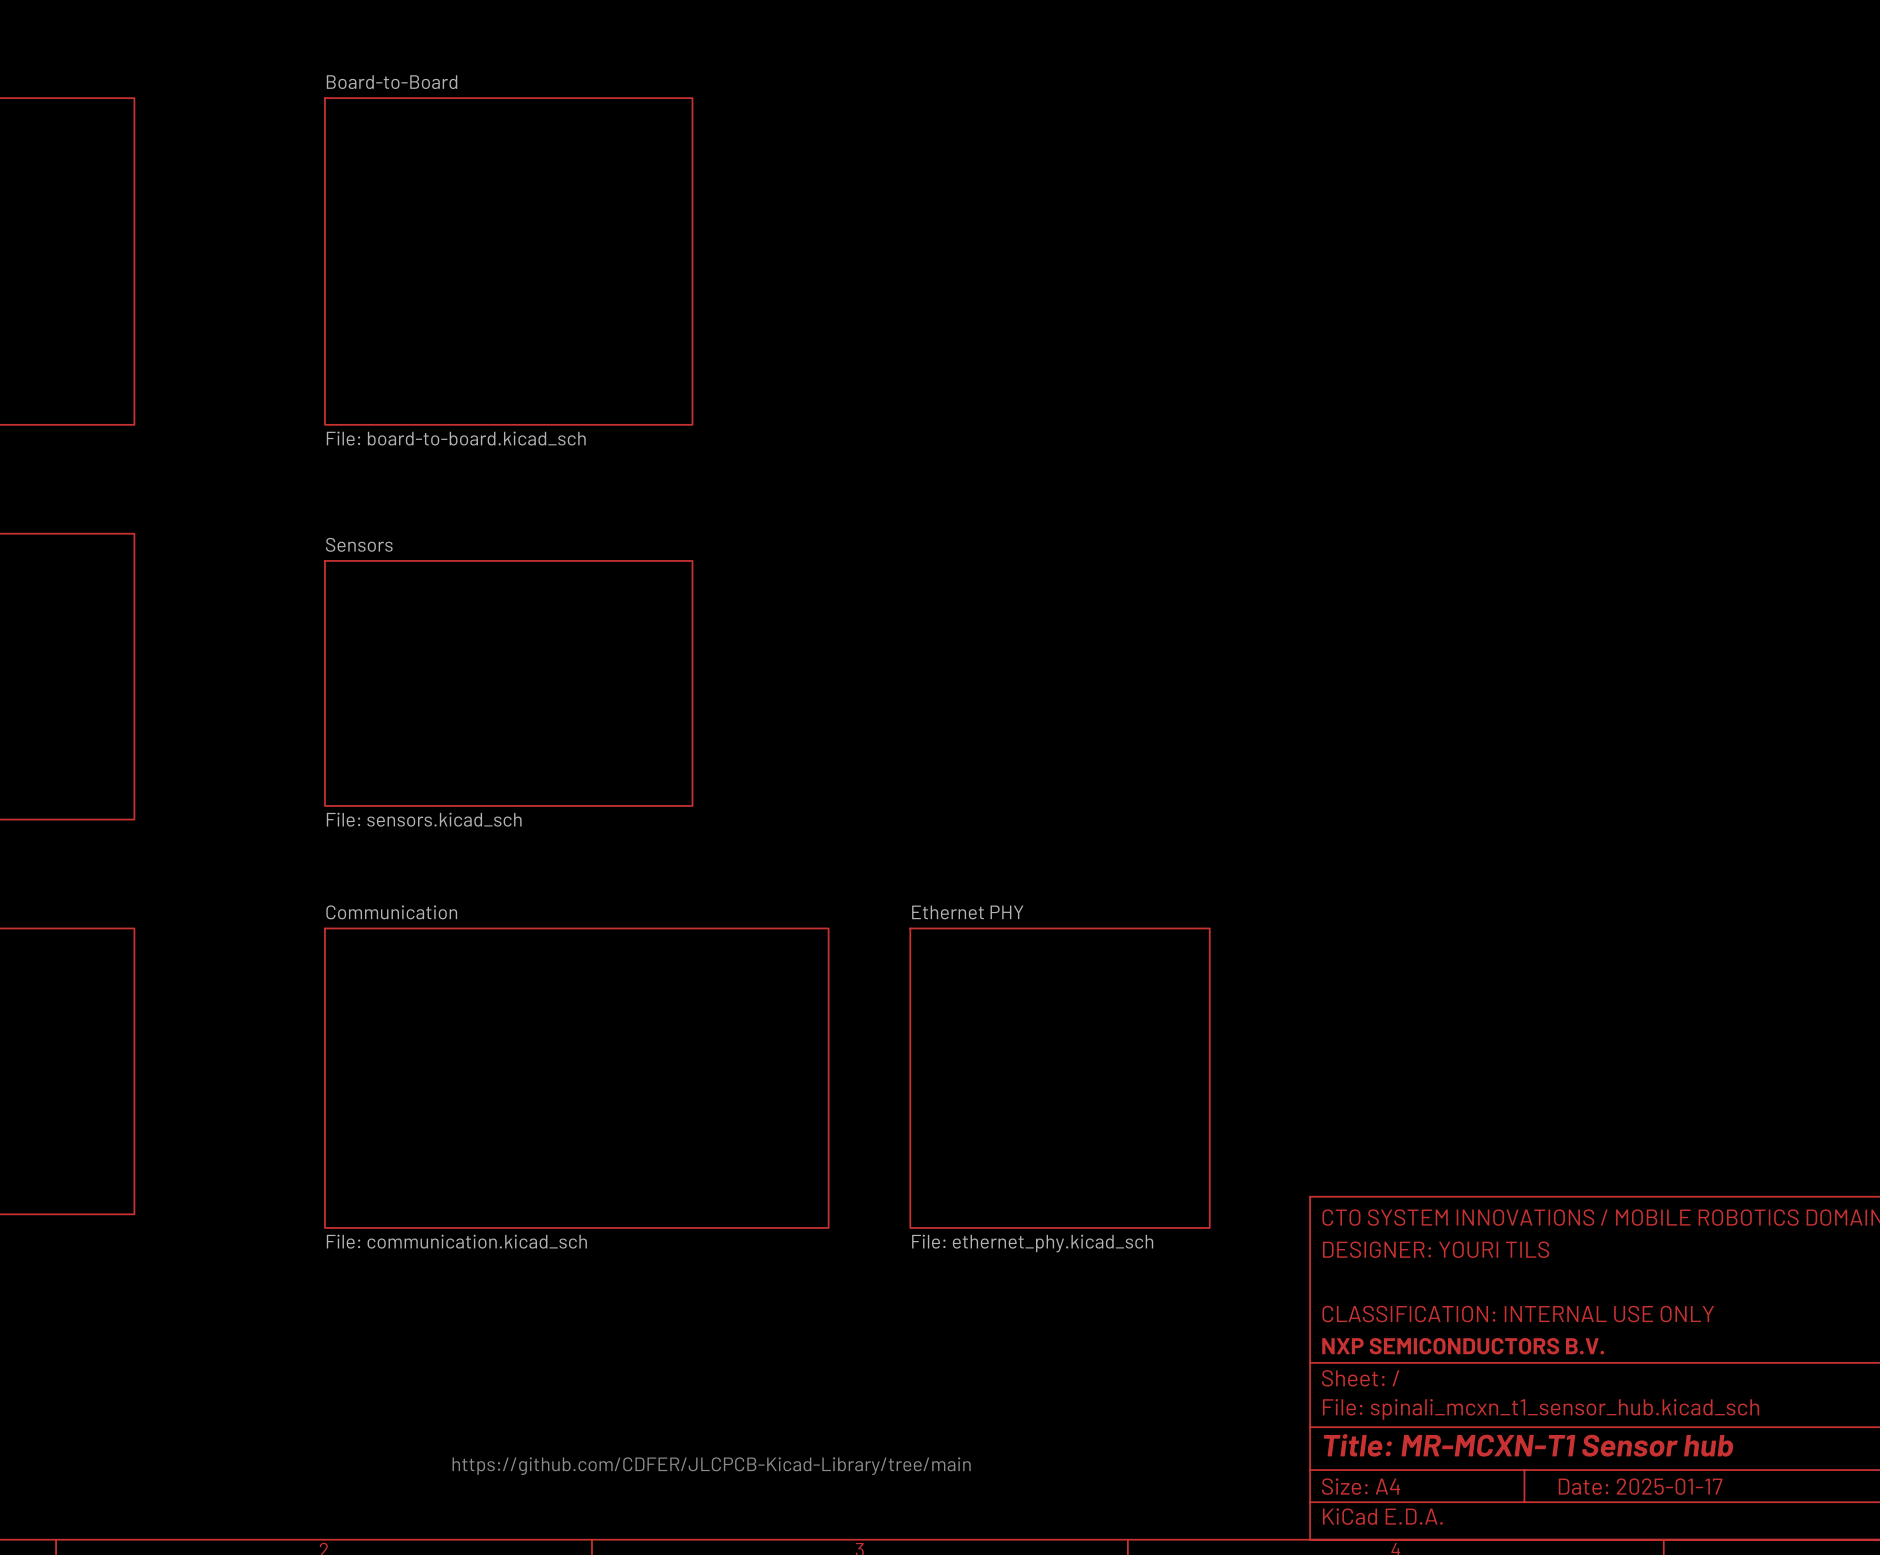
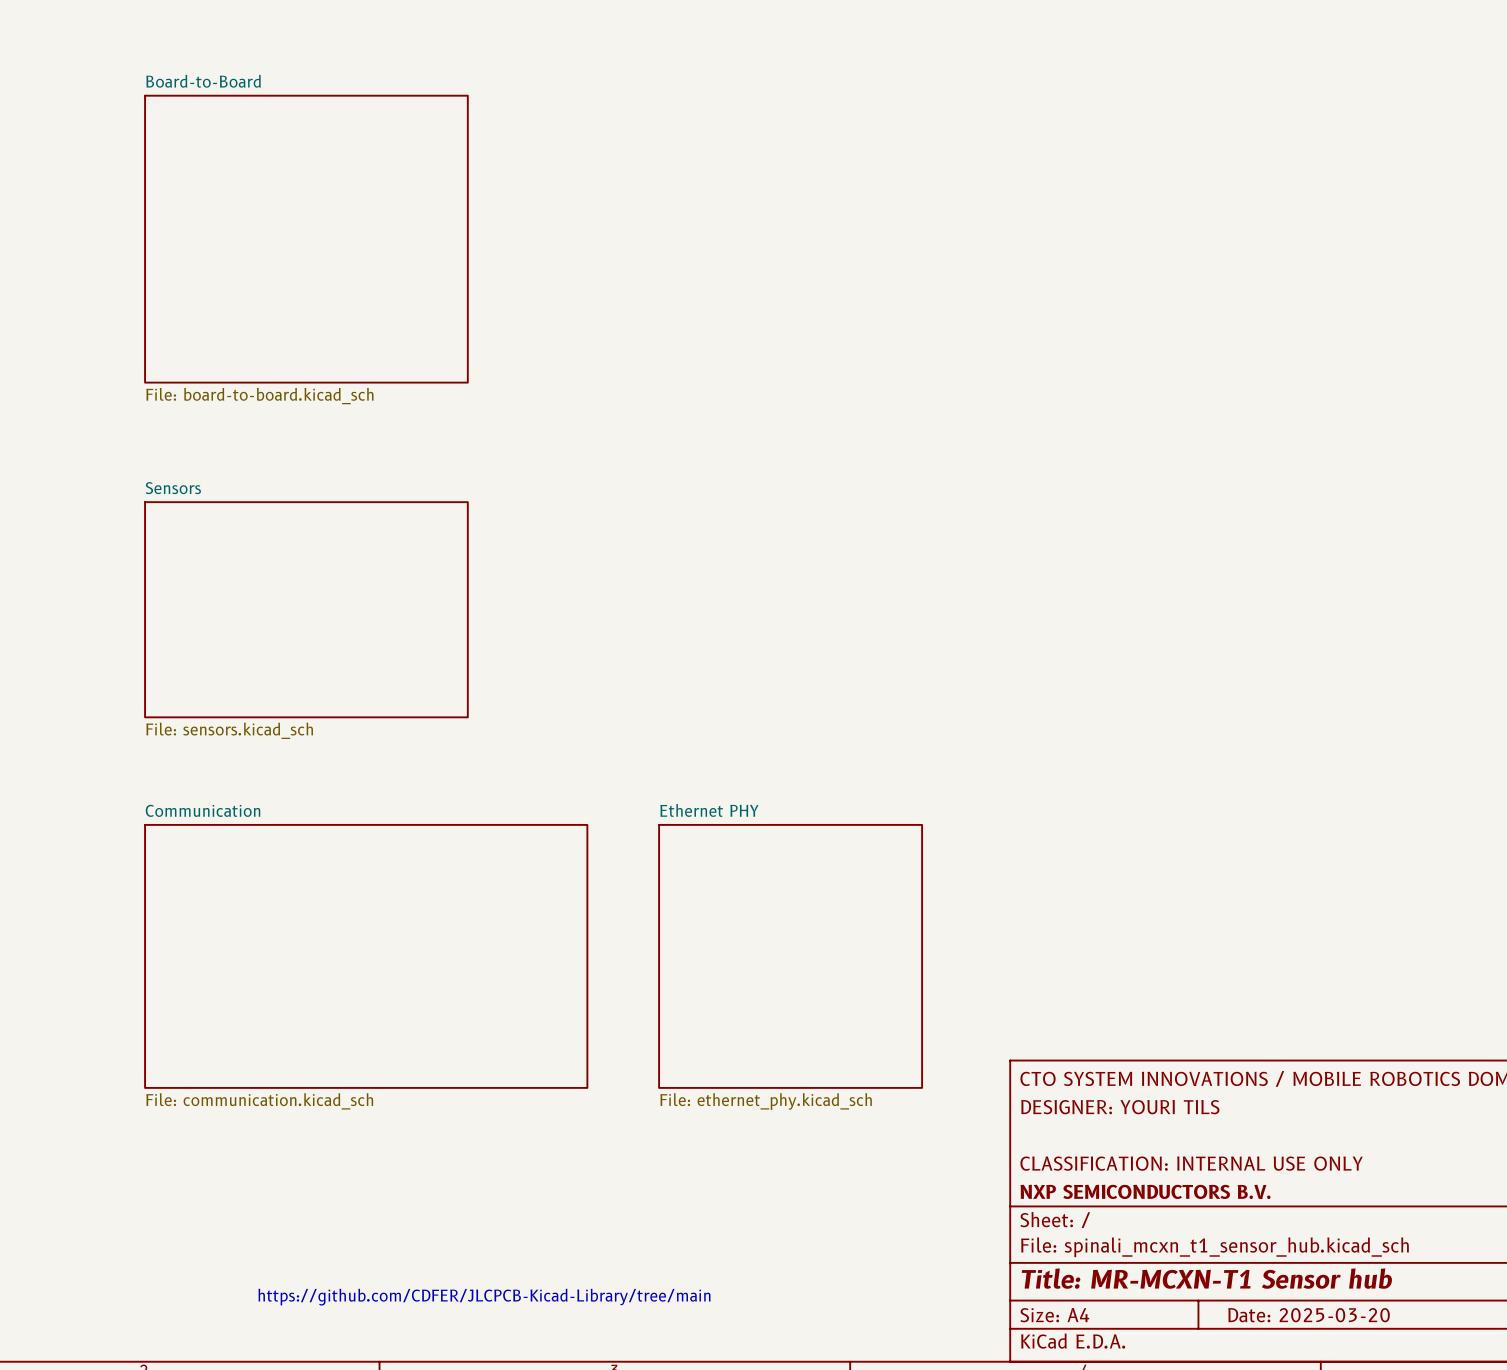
title block: Date: 2025-01-17 (1640, 1486) -> Date: 2025-03-20 (1309, 1315)

